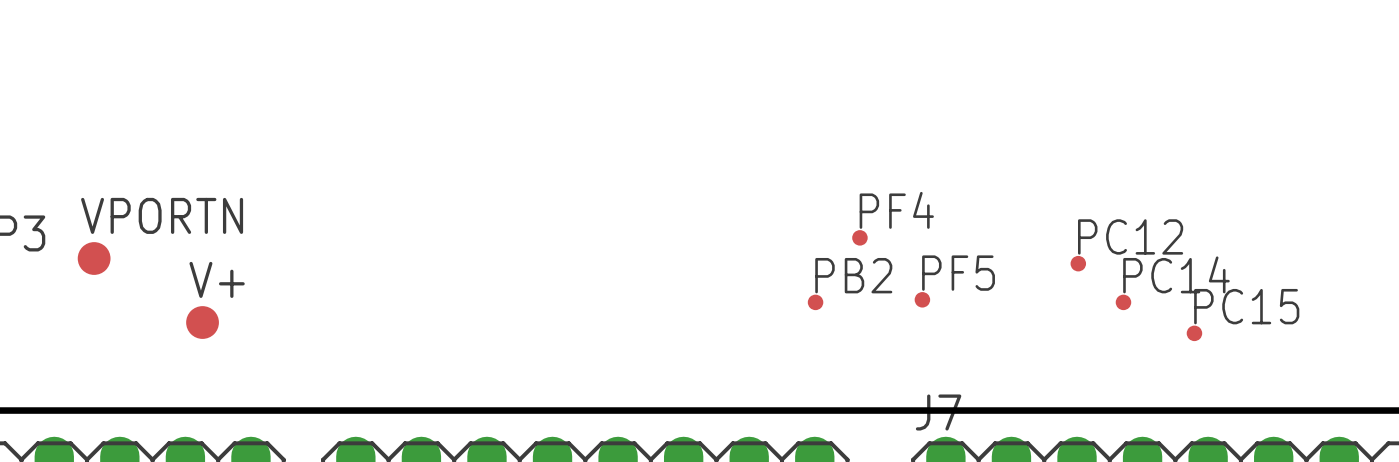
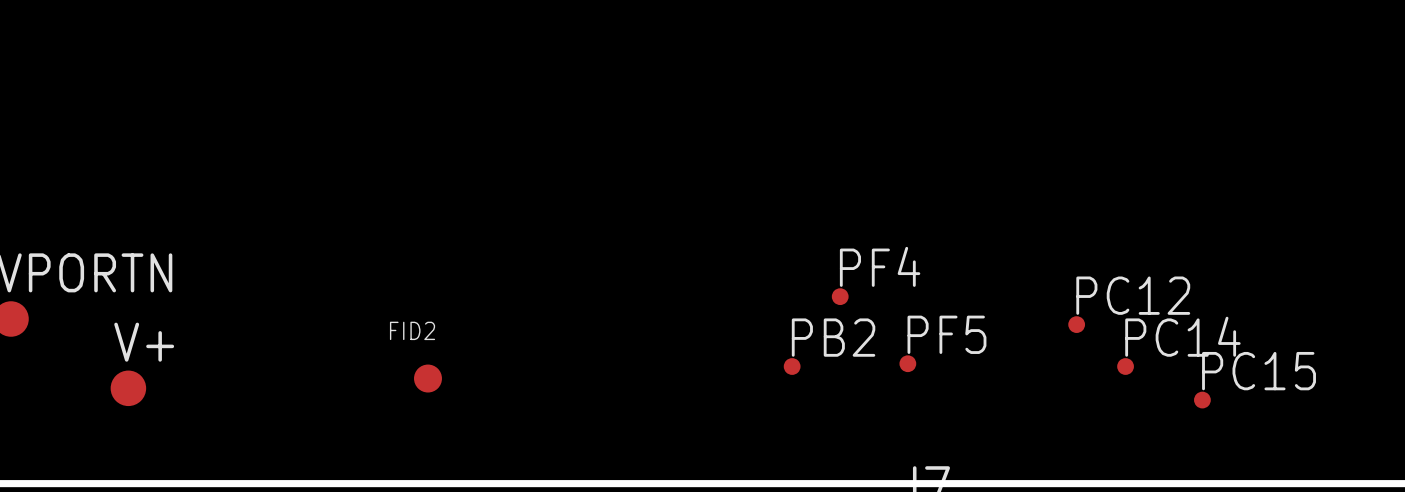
FID2: none -> (427, 378)

